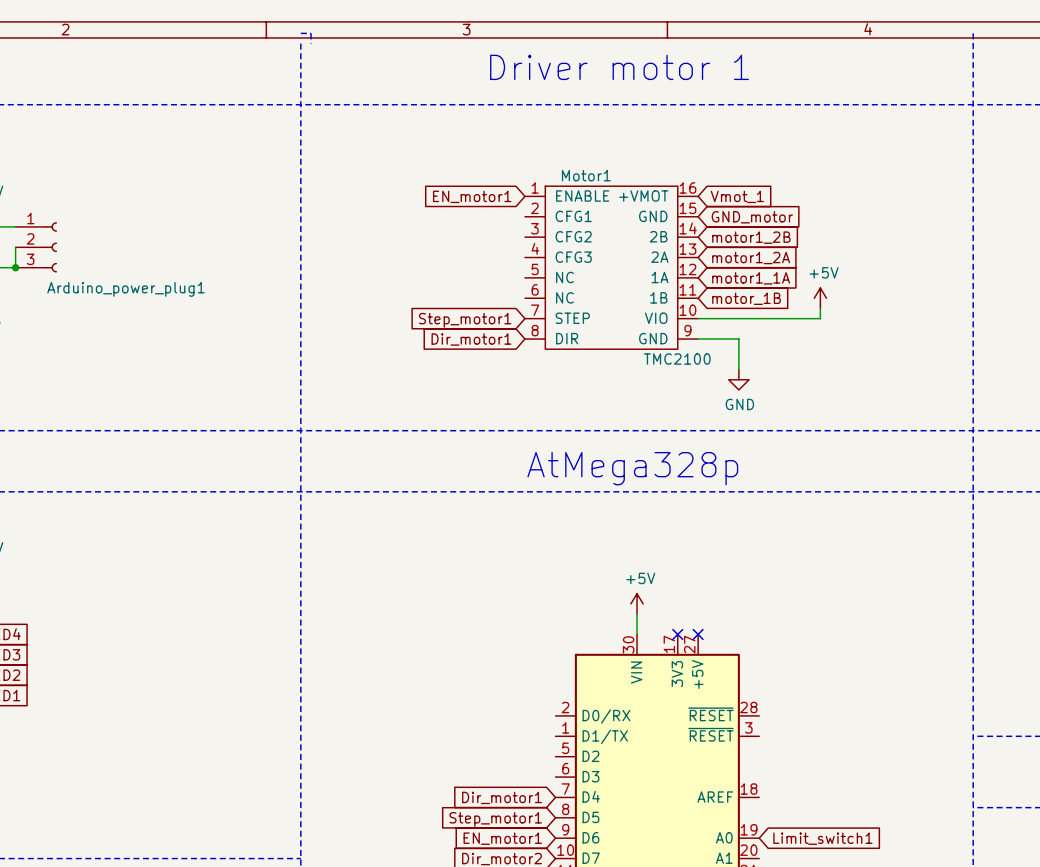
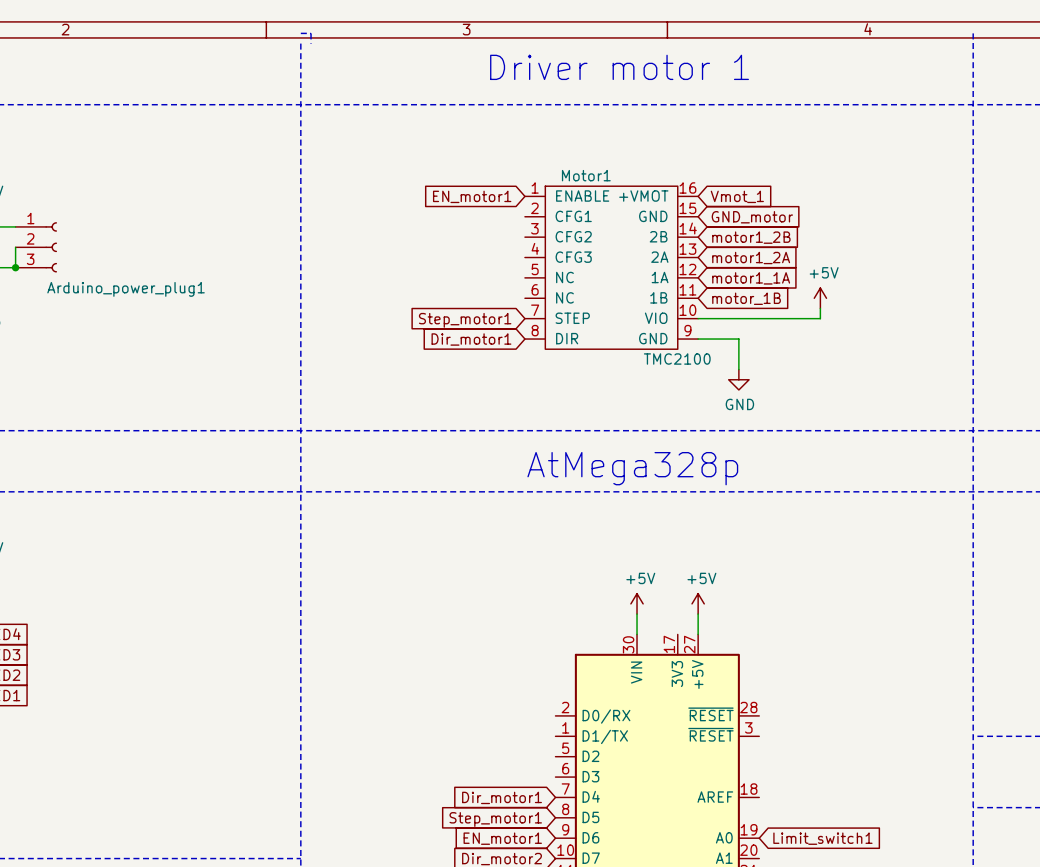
power symbol: none -> +5V (698, 603)
wire: none -> (698, 614) (698, 634)
no-connect mark: (677, 634) -> none
no-connect mark: (698, 634) -> none

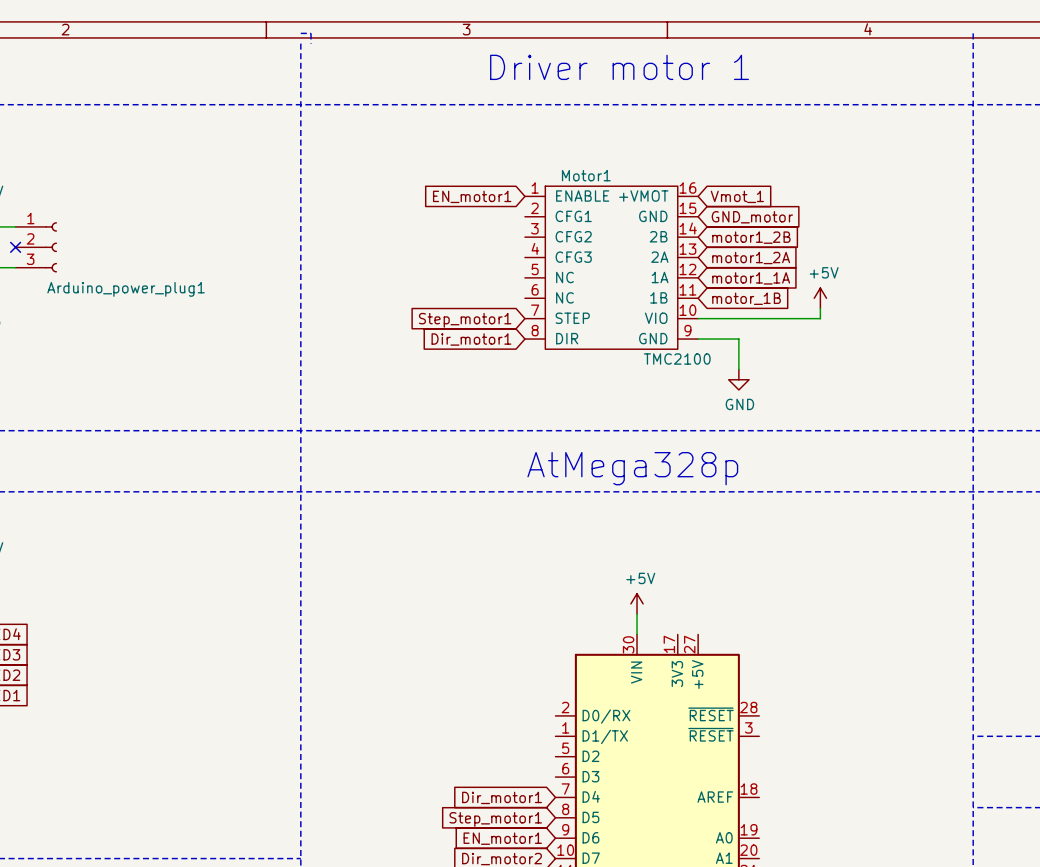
wire: (15, 247) (15, 267) -> none
no-connect mark: none -> (15, 247)
junction: (15, 267) -> none
power symbol: +5V (698, 603) -> none
wire: (698, 614) (698, 634) -> none
global label: Limit_switch1 (822, 838) -> none

